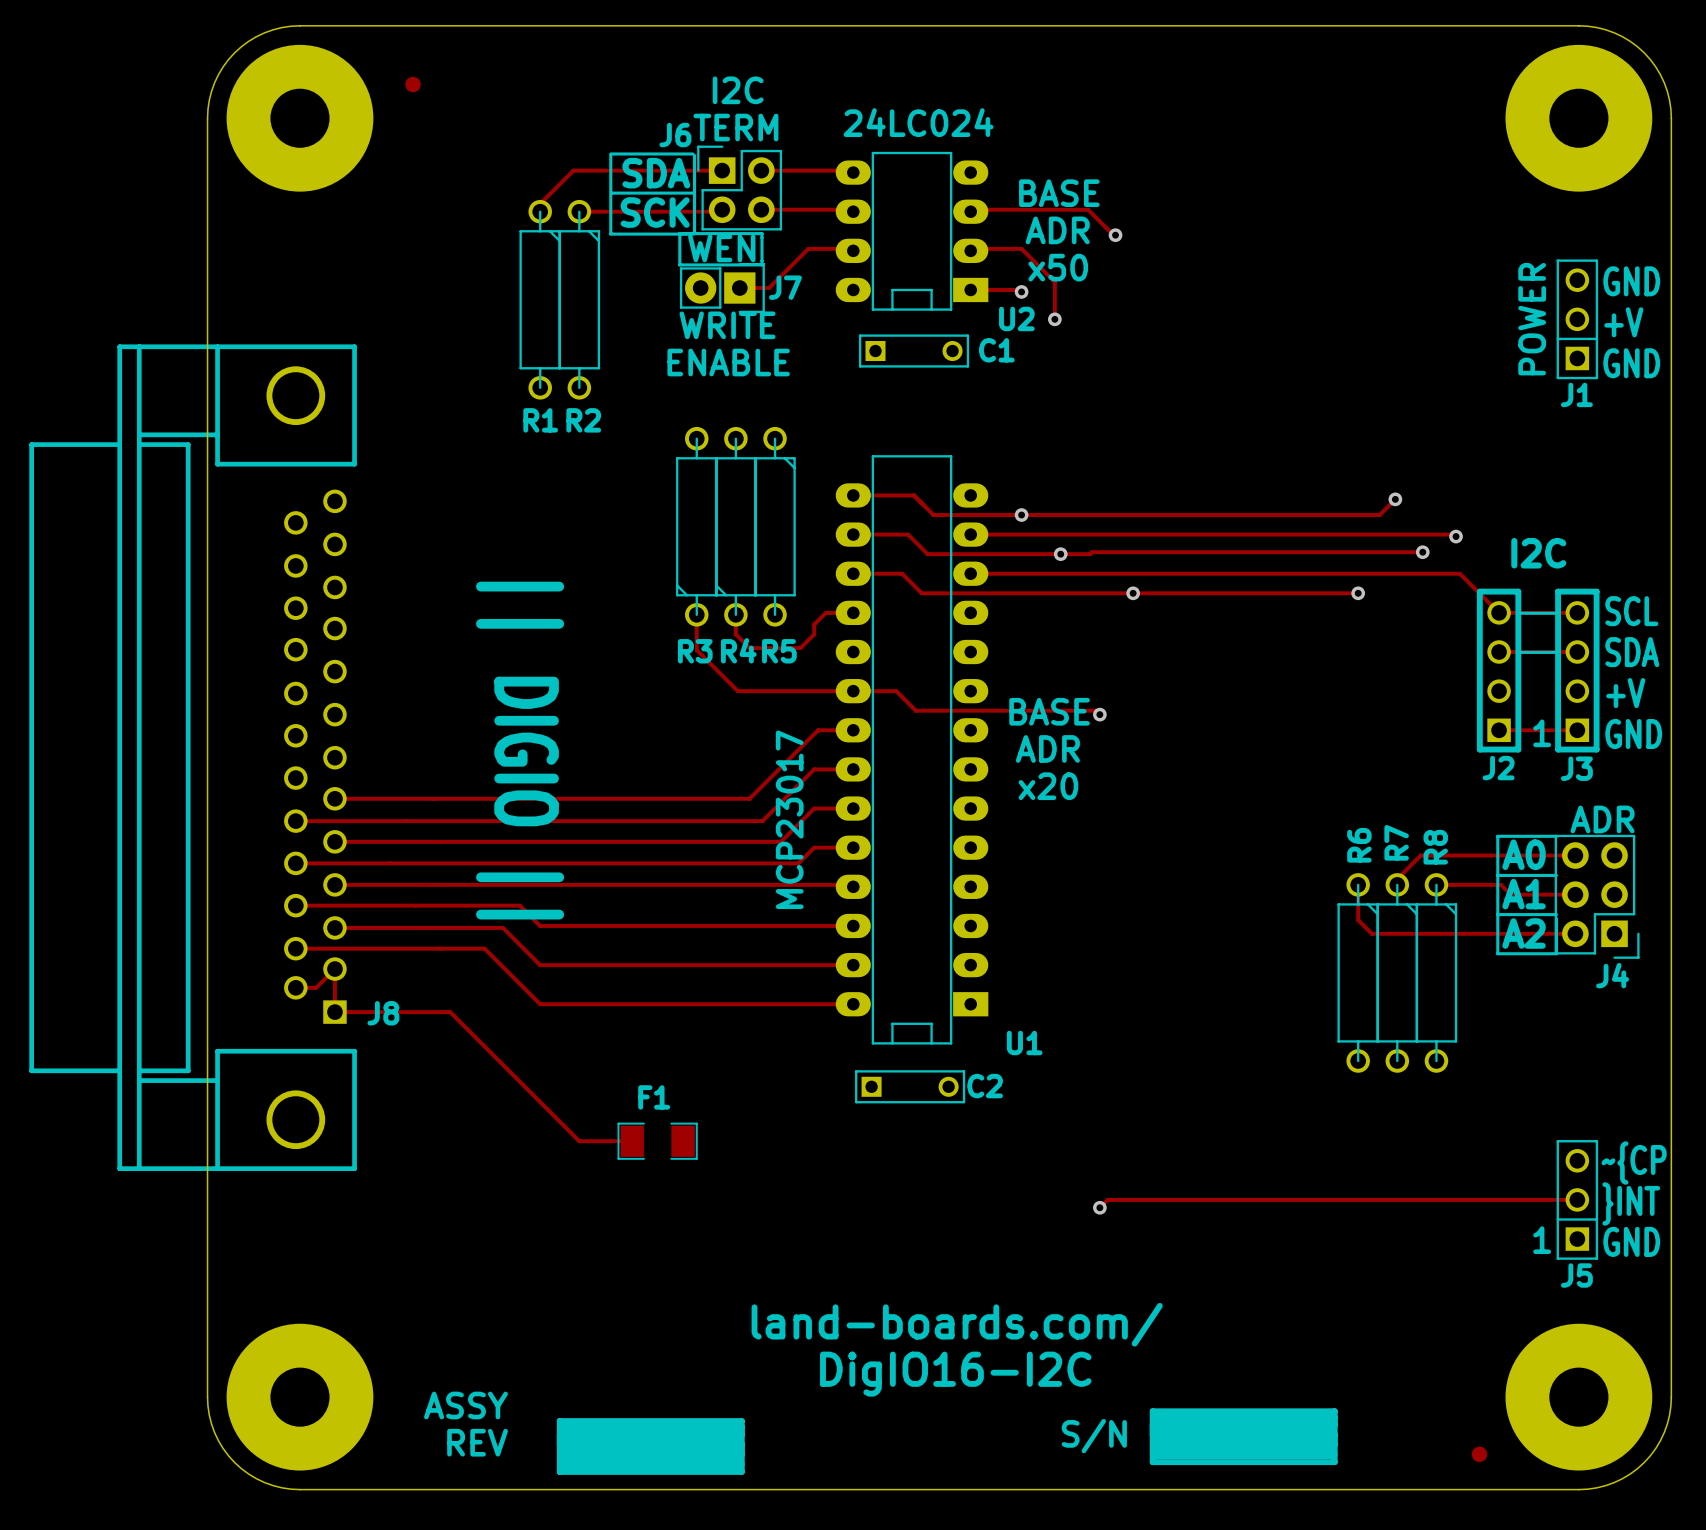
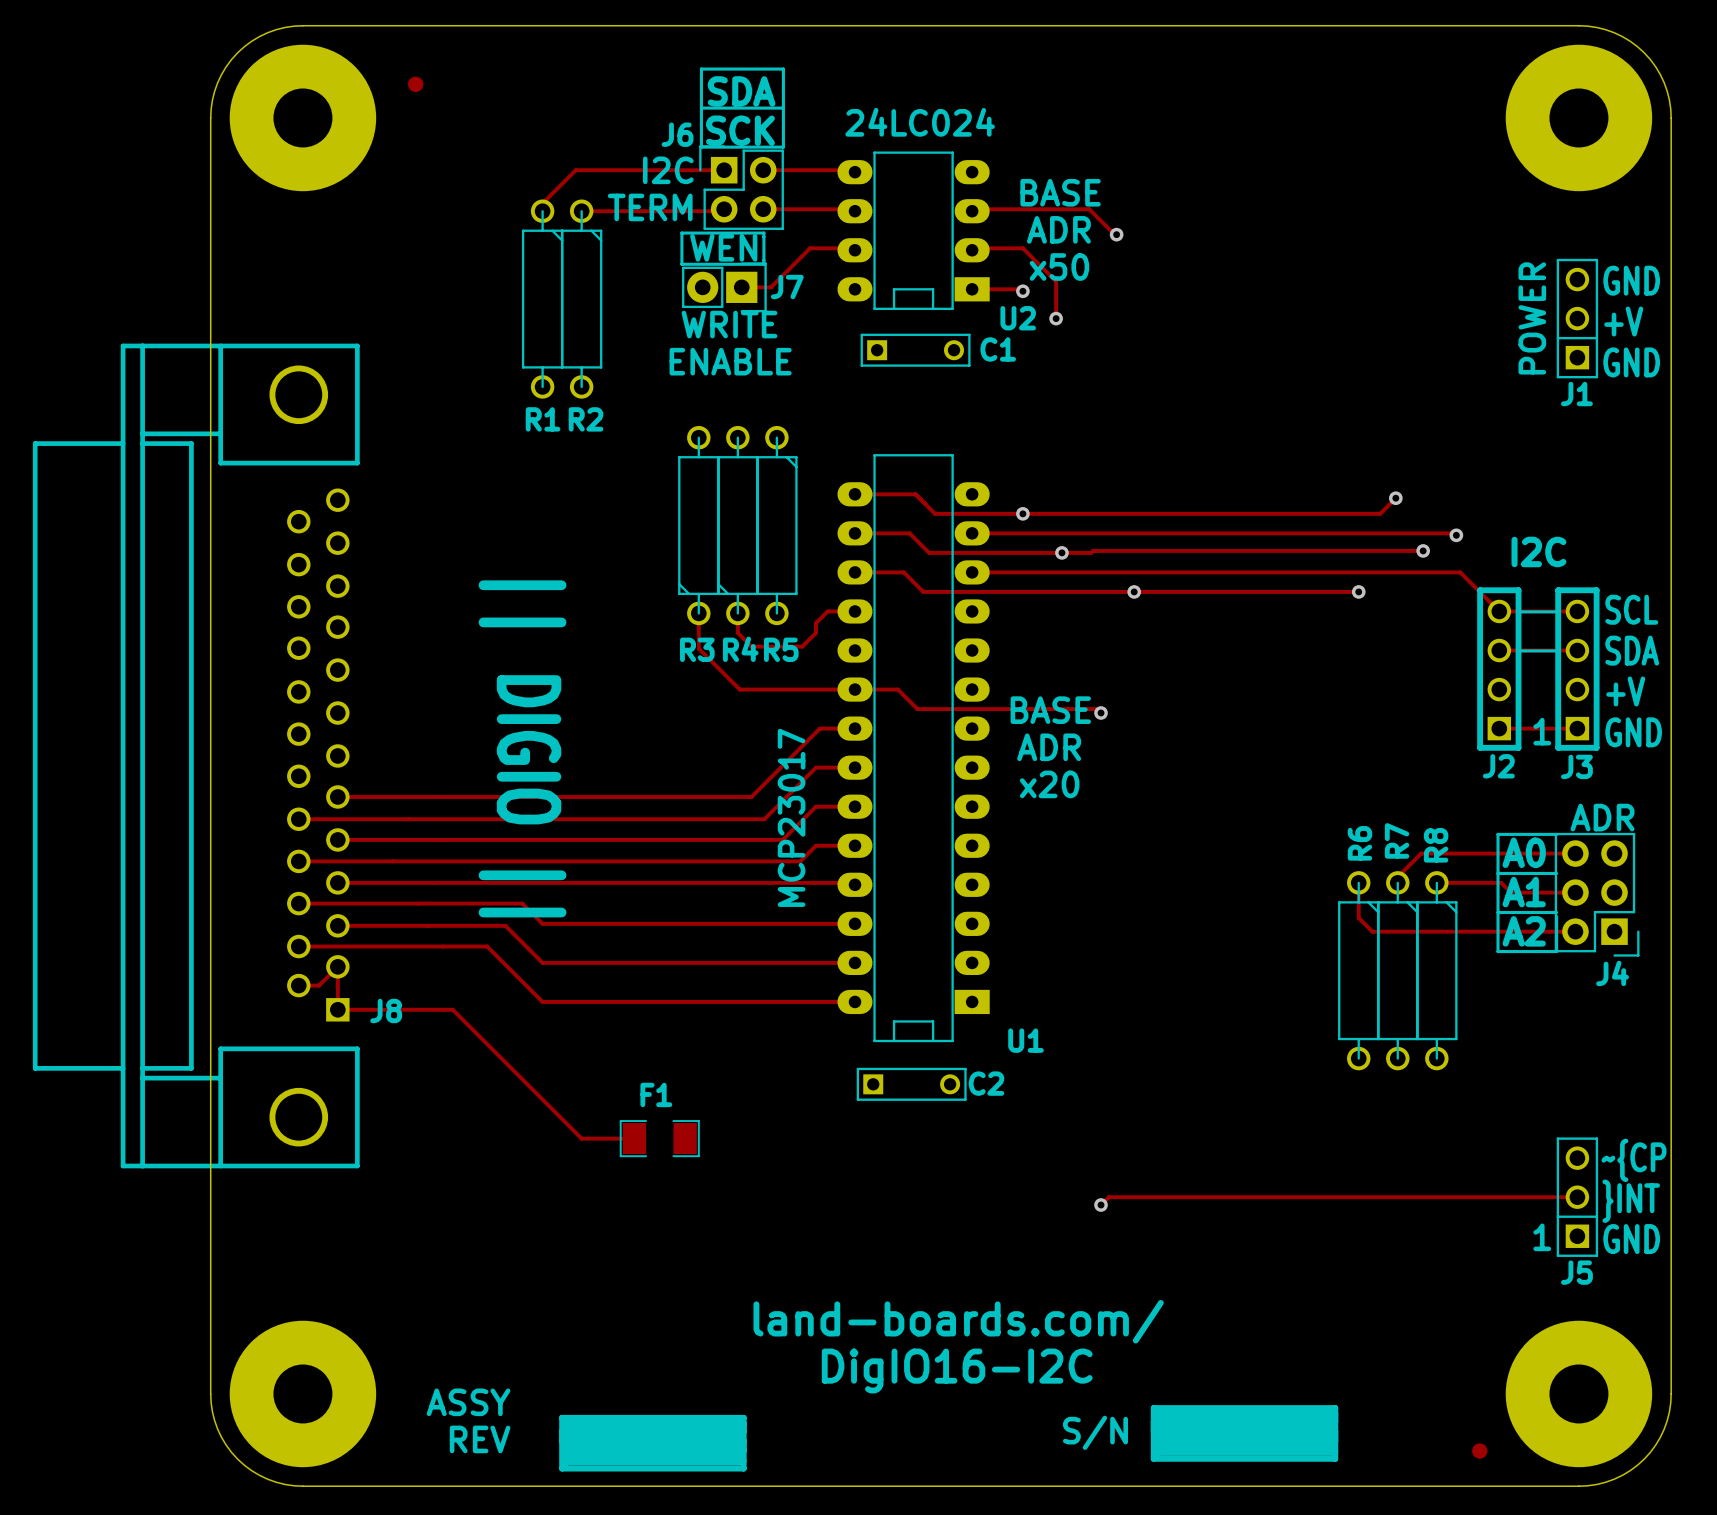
line: none -> (701, 69) (701, 147) (783, 147) (783, 69) (701, 69)
text position: I2C (738, 90) -> I2C (668, 170)
text position: TERM (735, 127) -> TERM (650, 207)
line: (610, 153) (692, 153) -> (701, 108) (783, 108)
line: (610, 155) (610, 233) -> none
line: (694, 155) (694, 233) -> none
text position: SDA (656, 173) -> SDA (741, 91)
line: (612, 193) (694, 193) -> none
text position: SCK (655, 212) -> SCK (740, 130)
line: (610, 234) (692, 234) -> none

